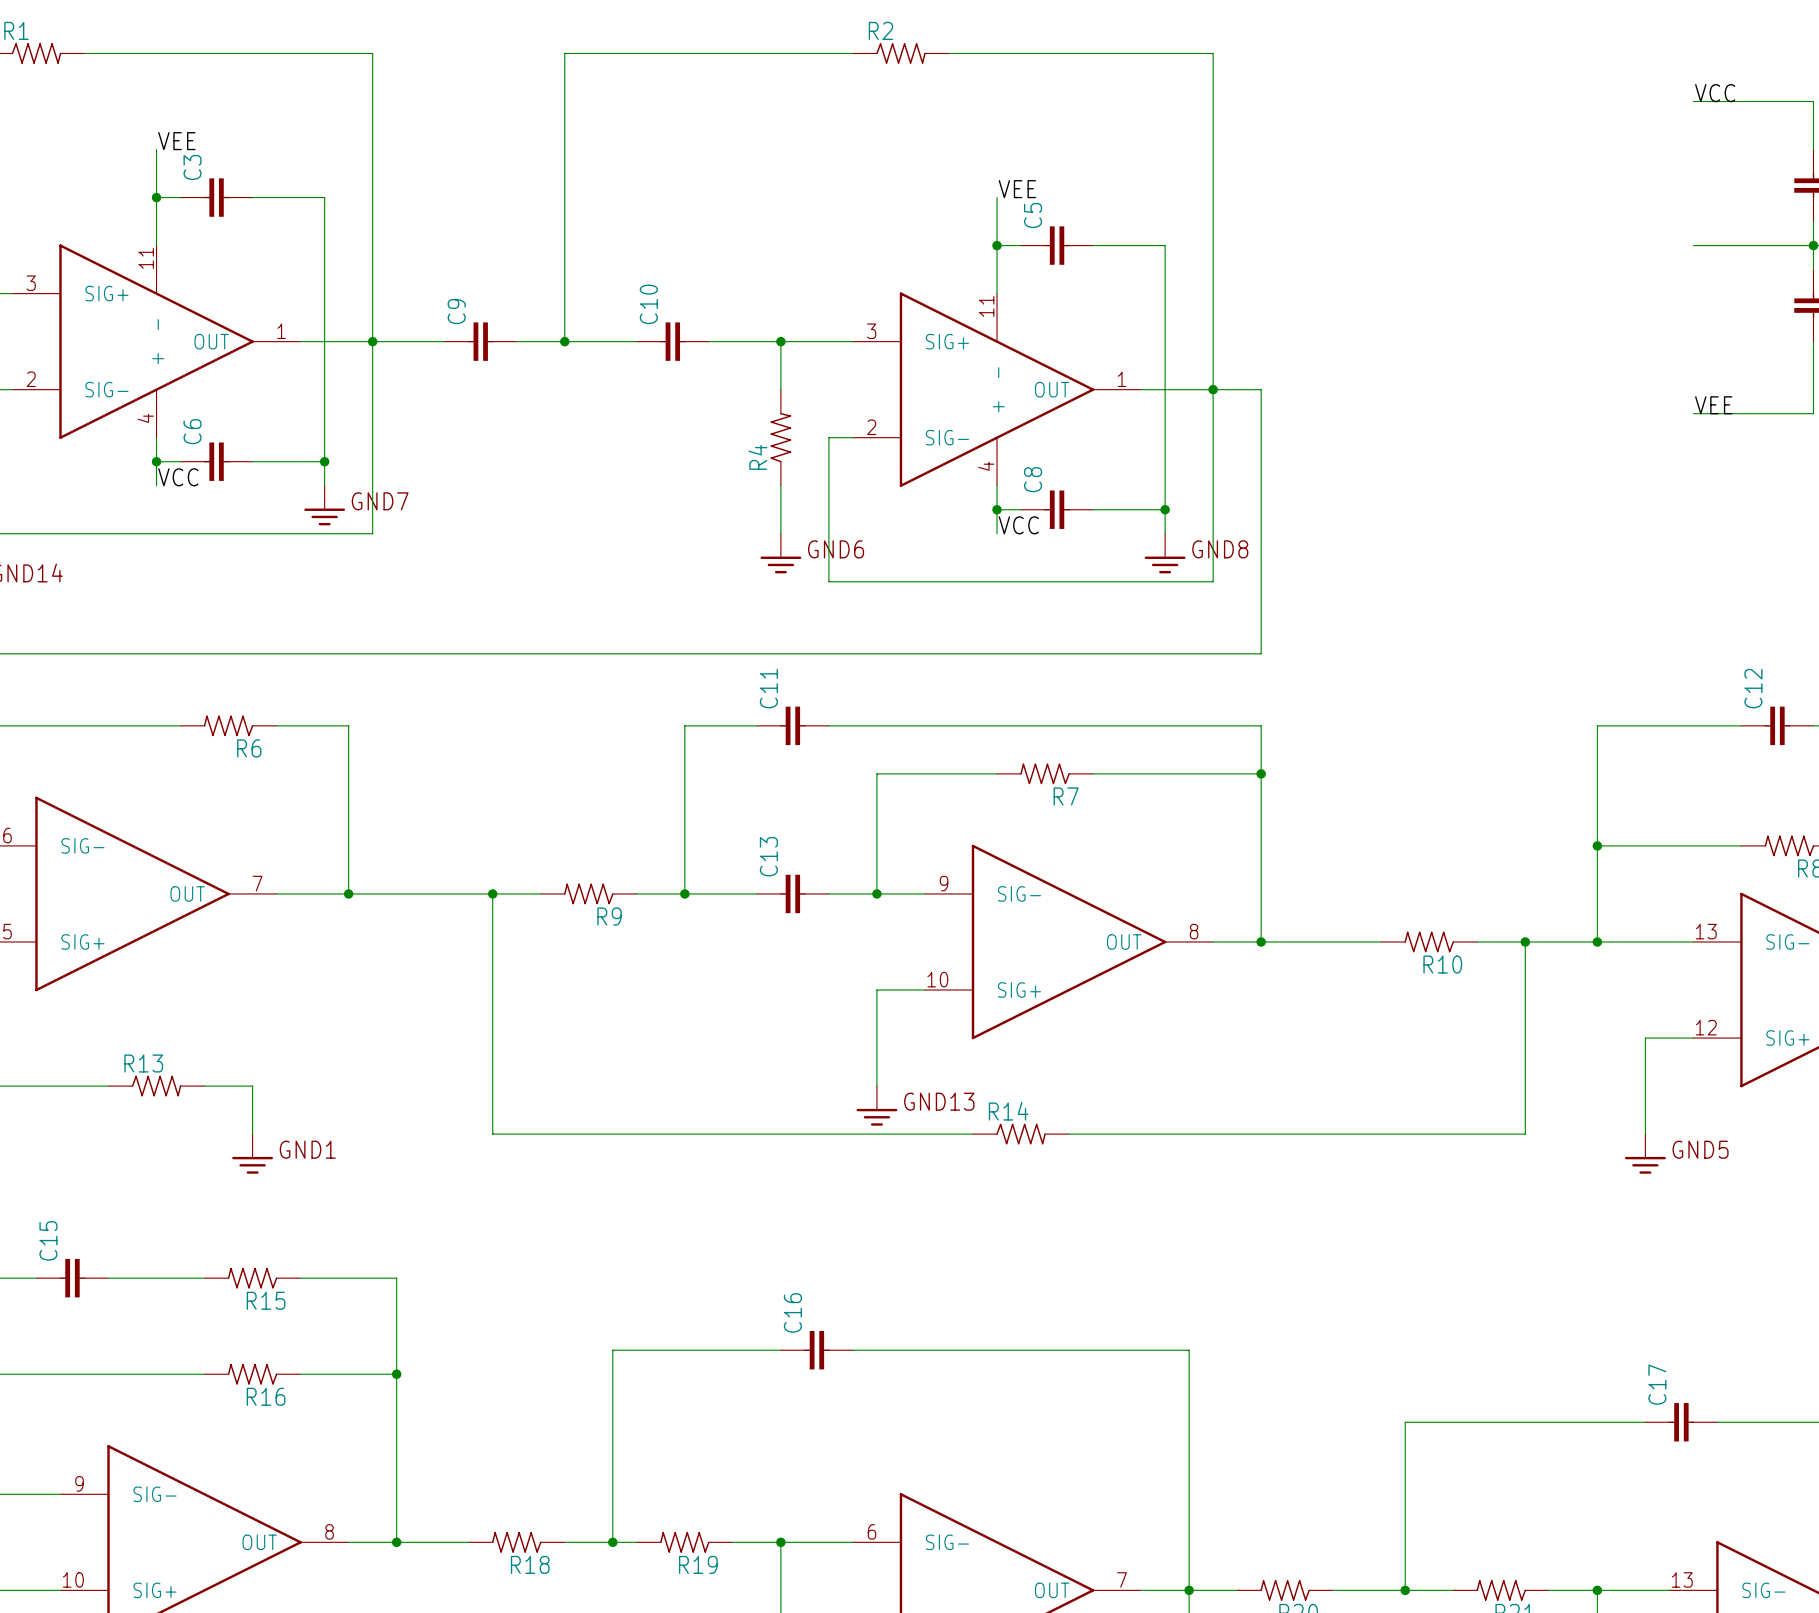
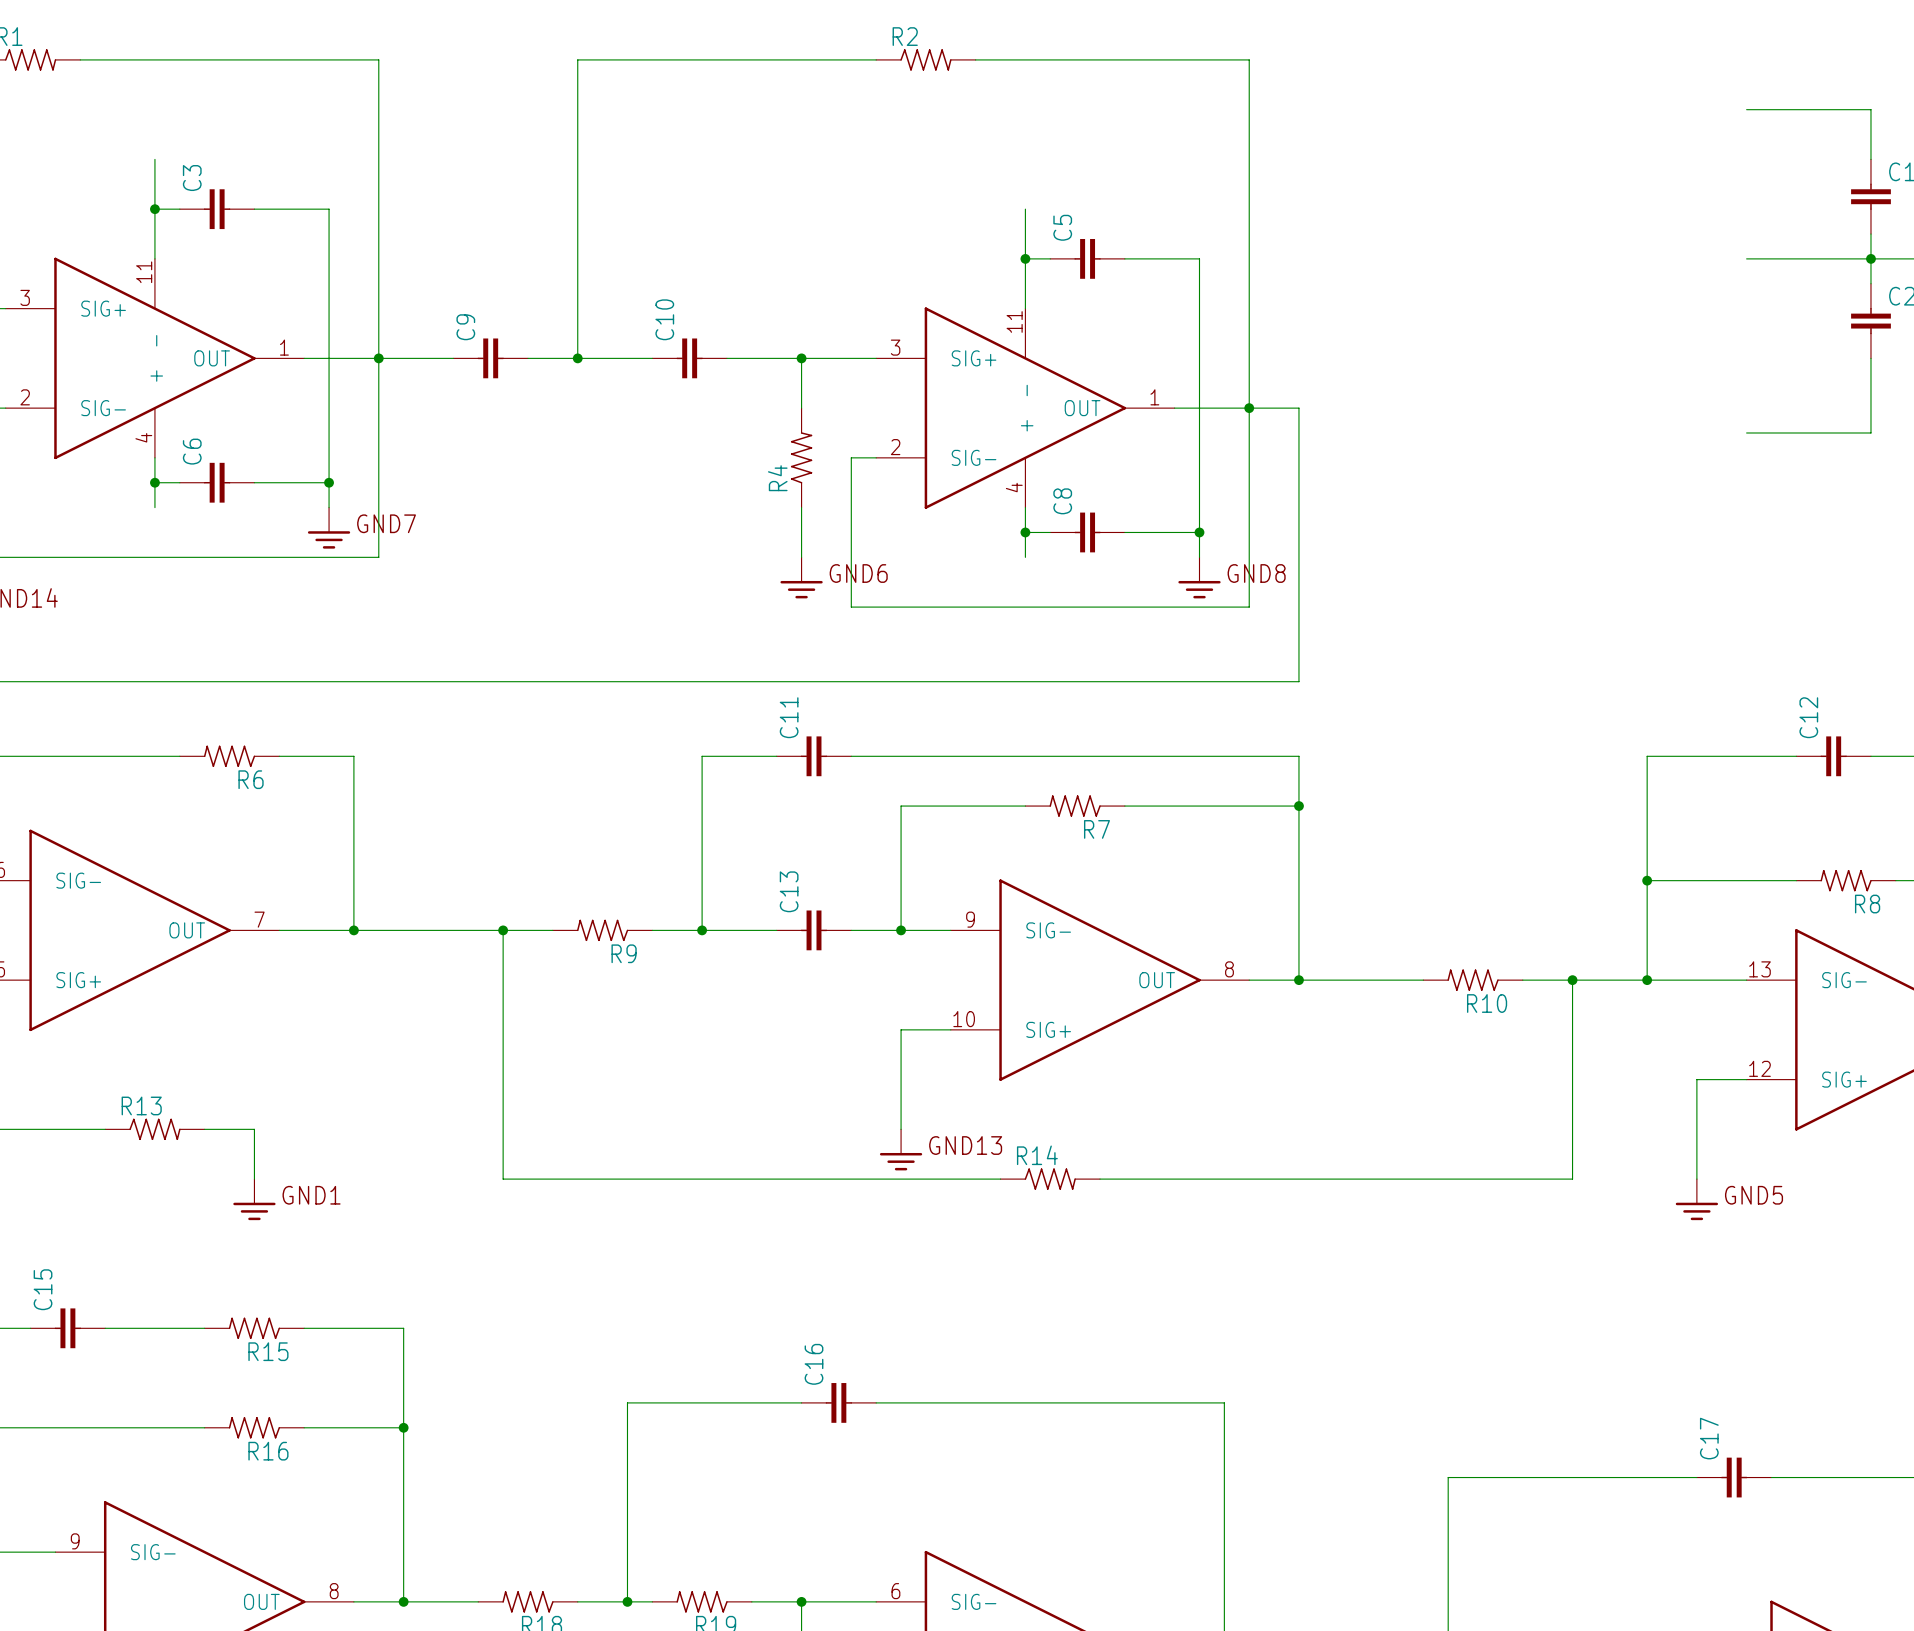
label: VCC (1715, 93) -> none
label: VEE (176, 141) -> none
label: VEE (1017, 189) -> none
label: VEE (1713, 405) -> none
label: VCC (178, 477) -> none
label: VCC (1018, 525) -> none

